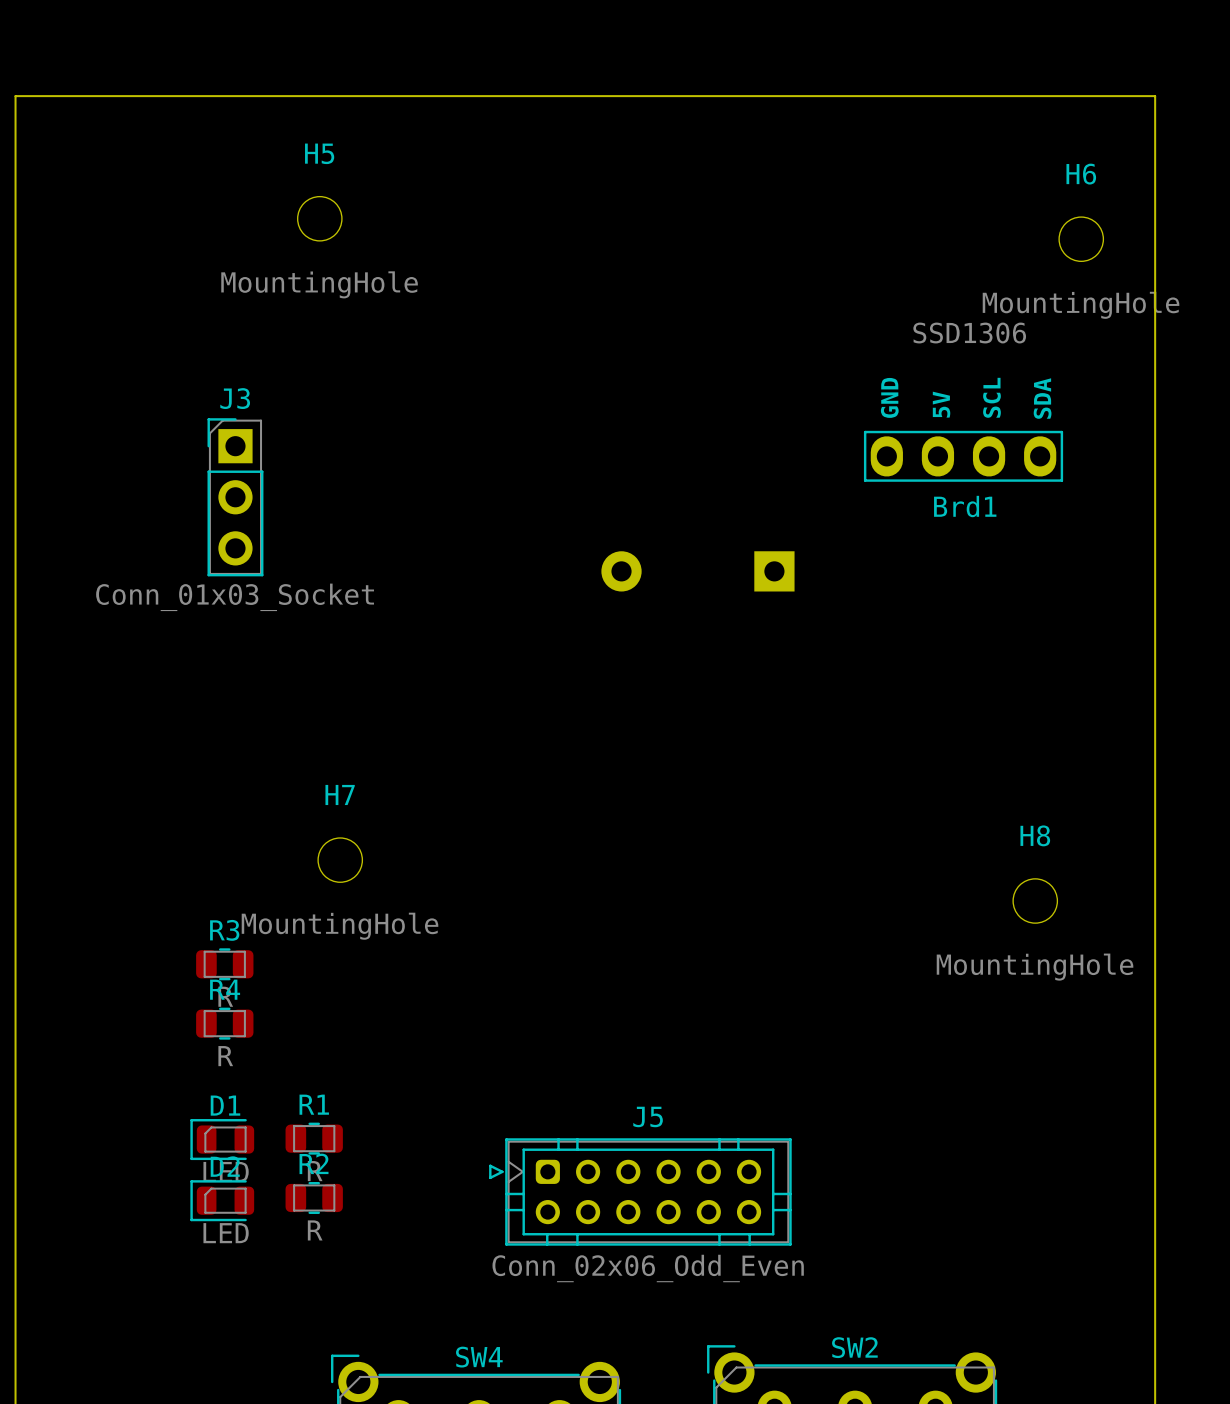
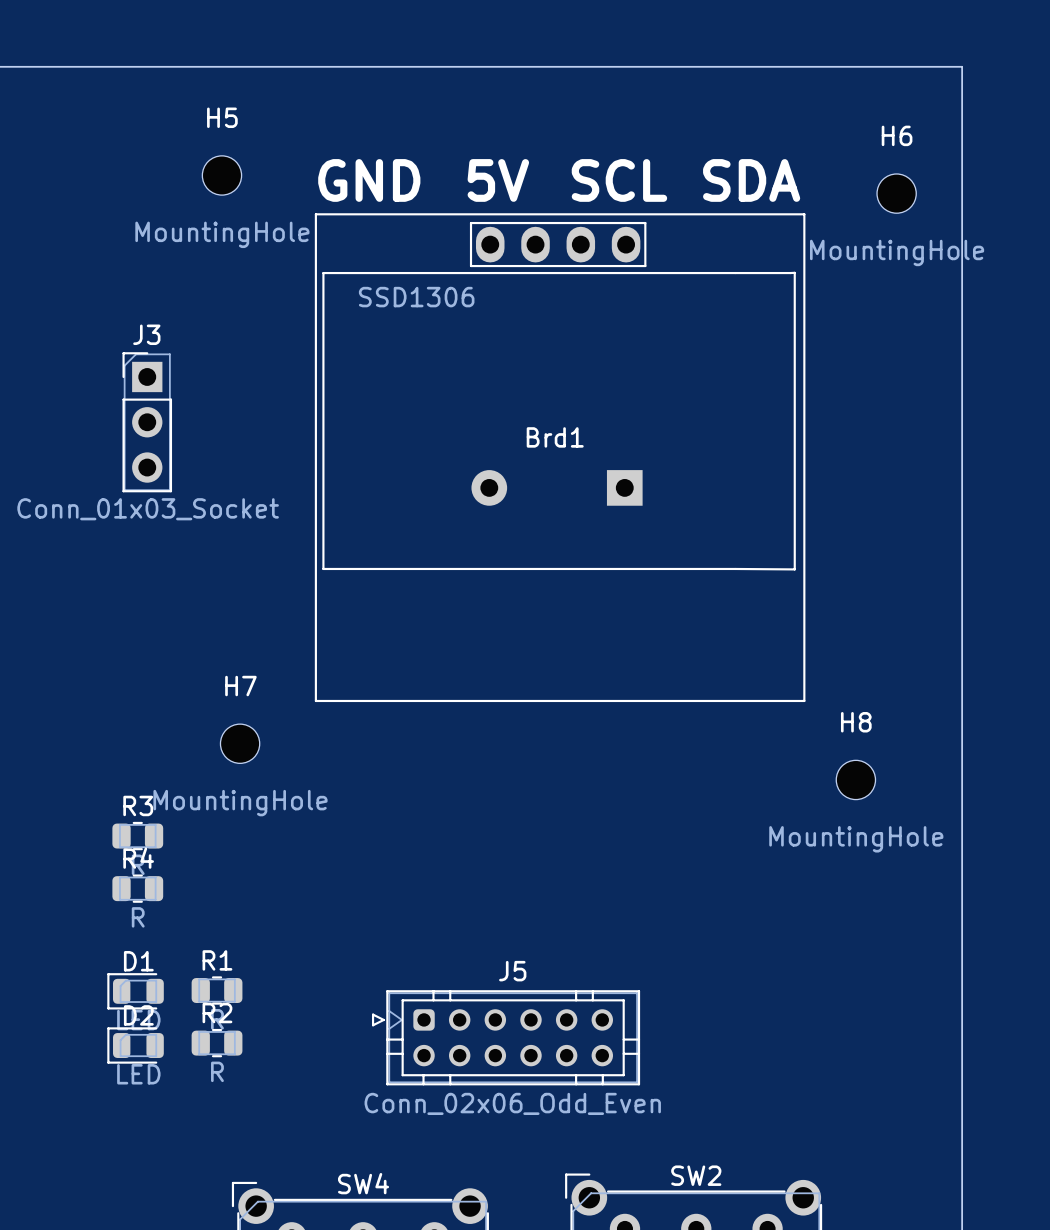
Brd1 value position: SSD1306 (969, 333) -> SSD1306 (416, 297)
Brd1 footprint: [863, 430, 1064, 482] -> [314, 213, 806, 703]
Brd1 name position: Brd1 (965, 506) -> Brd1 (555, 437)

